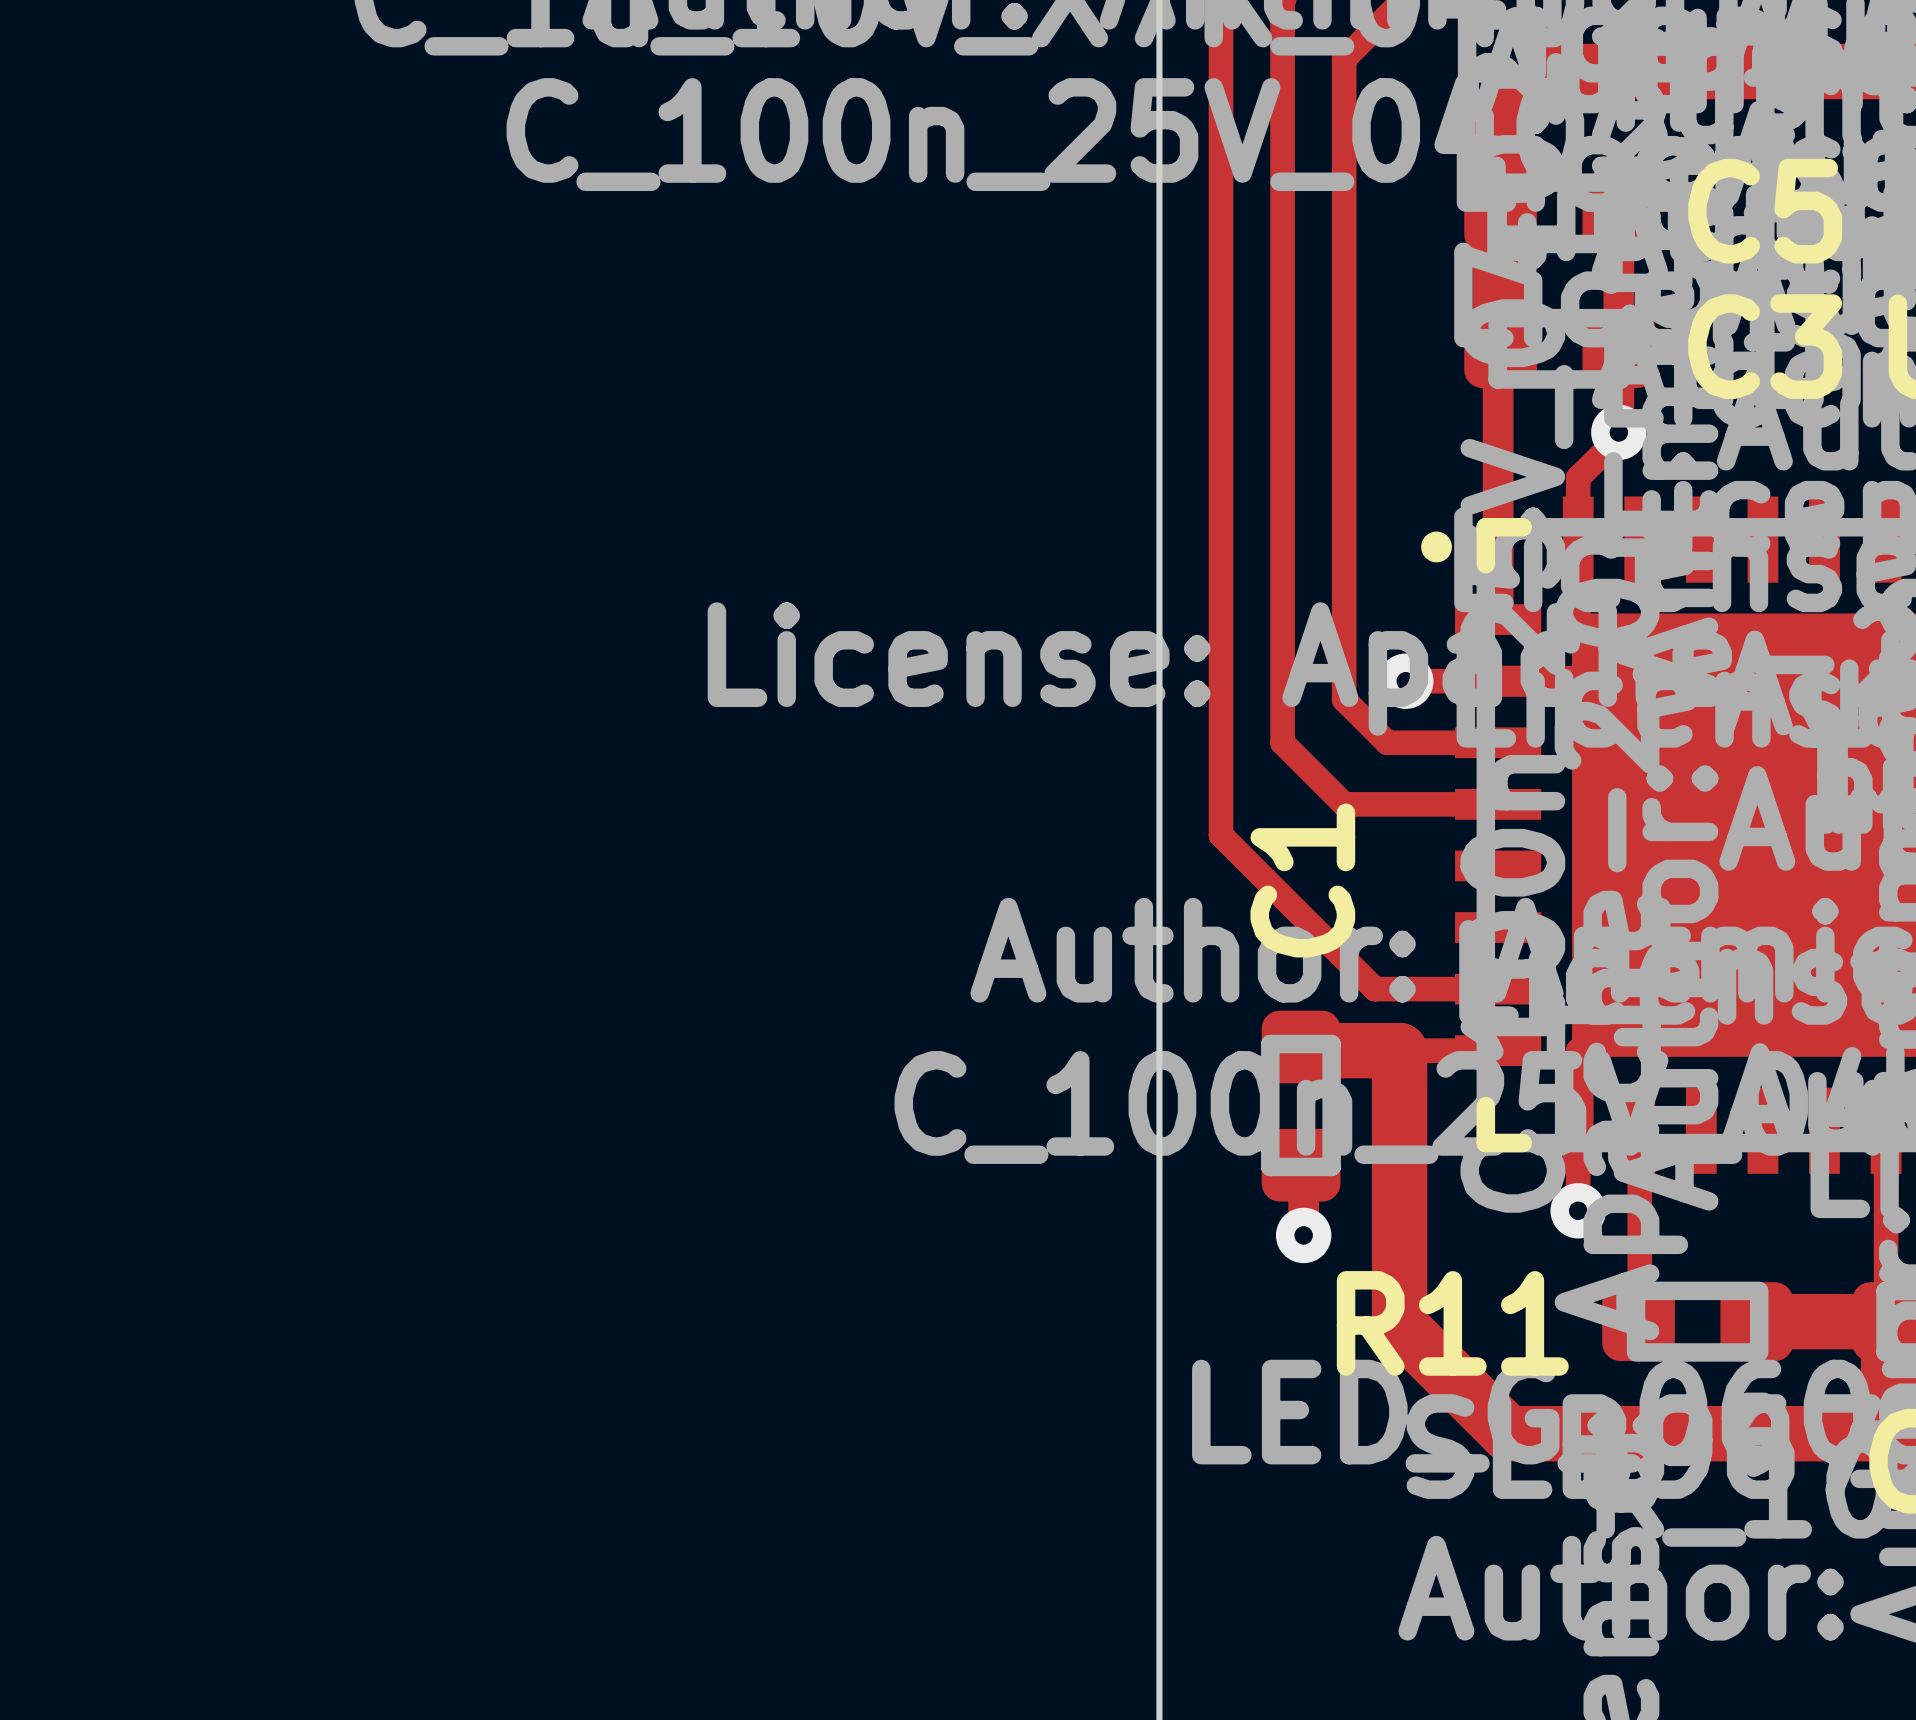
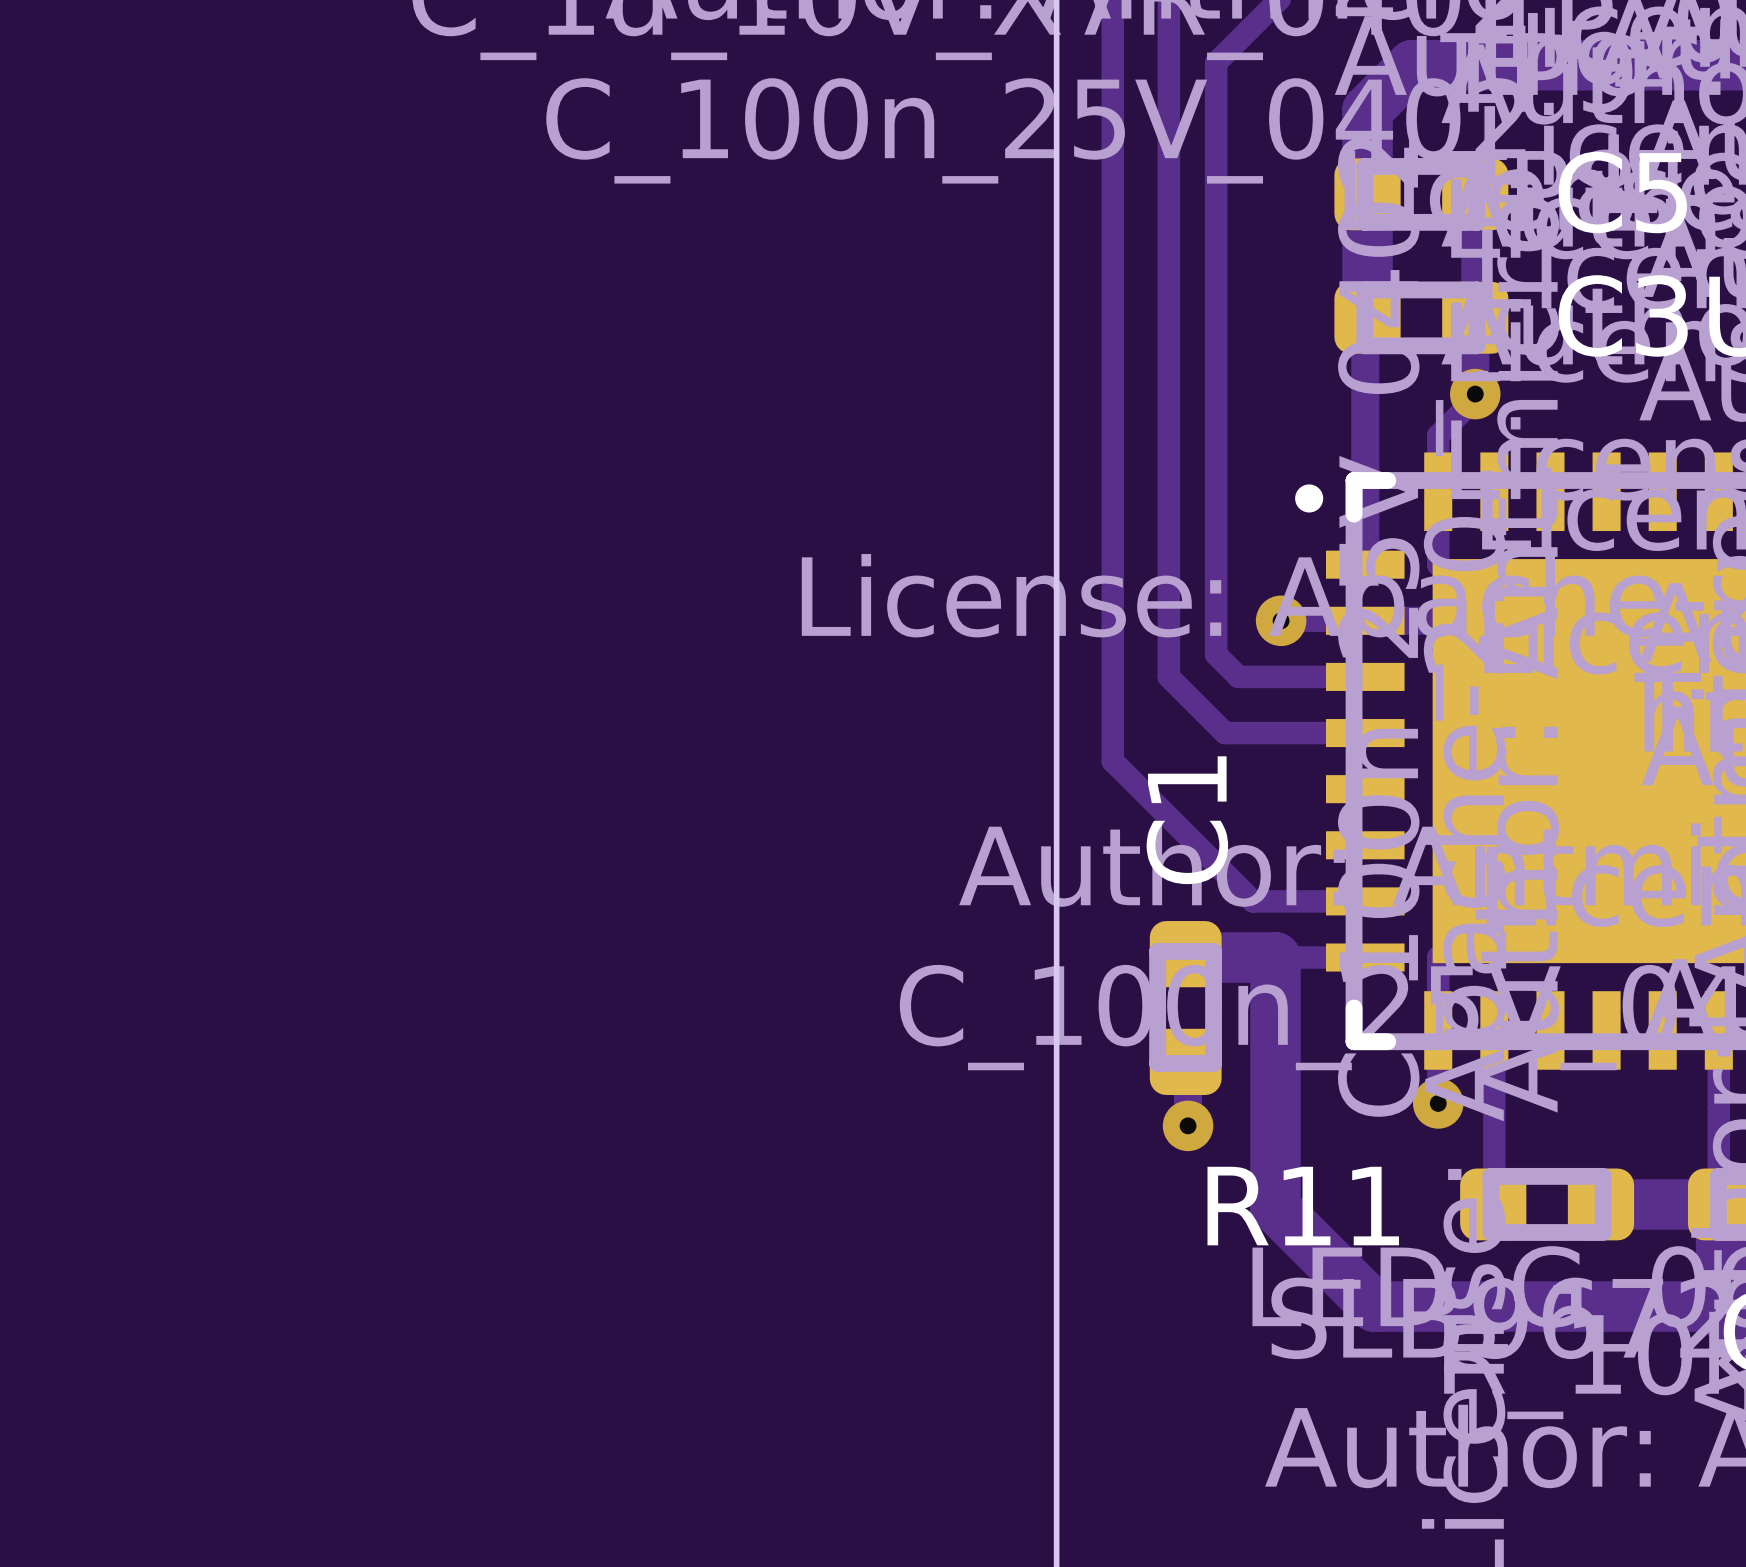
track: (1344, 59) (1344, 699) (1387, 742) -> (1224, 54) (1216, 62) (1216, 654) (1238, 676) (1264, 676)

